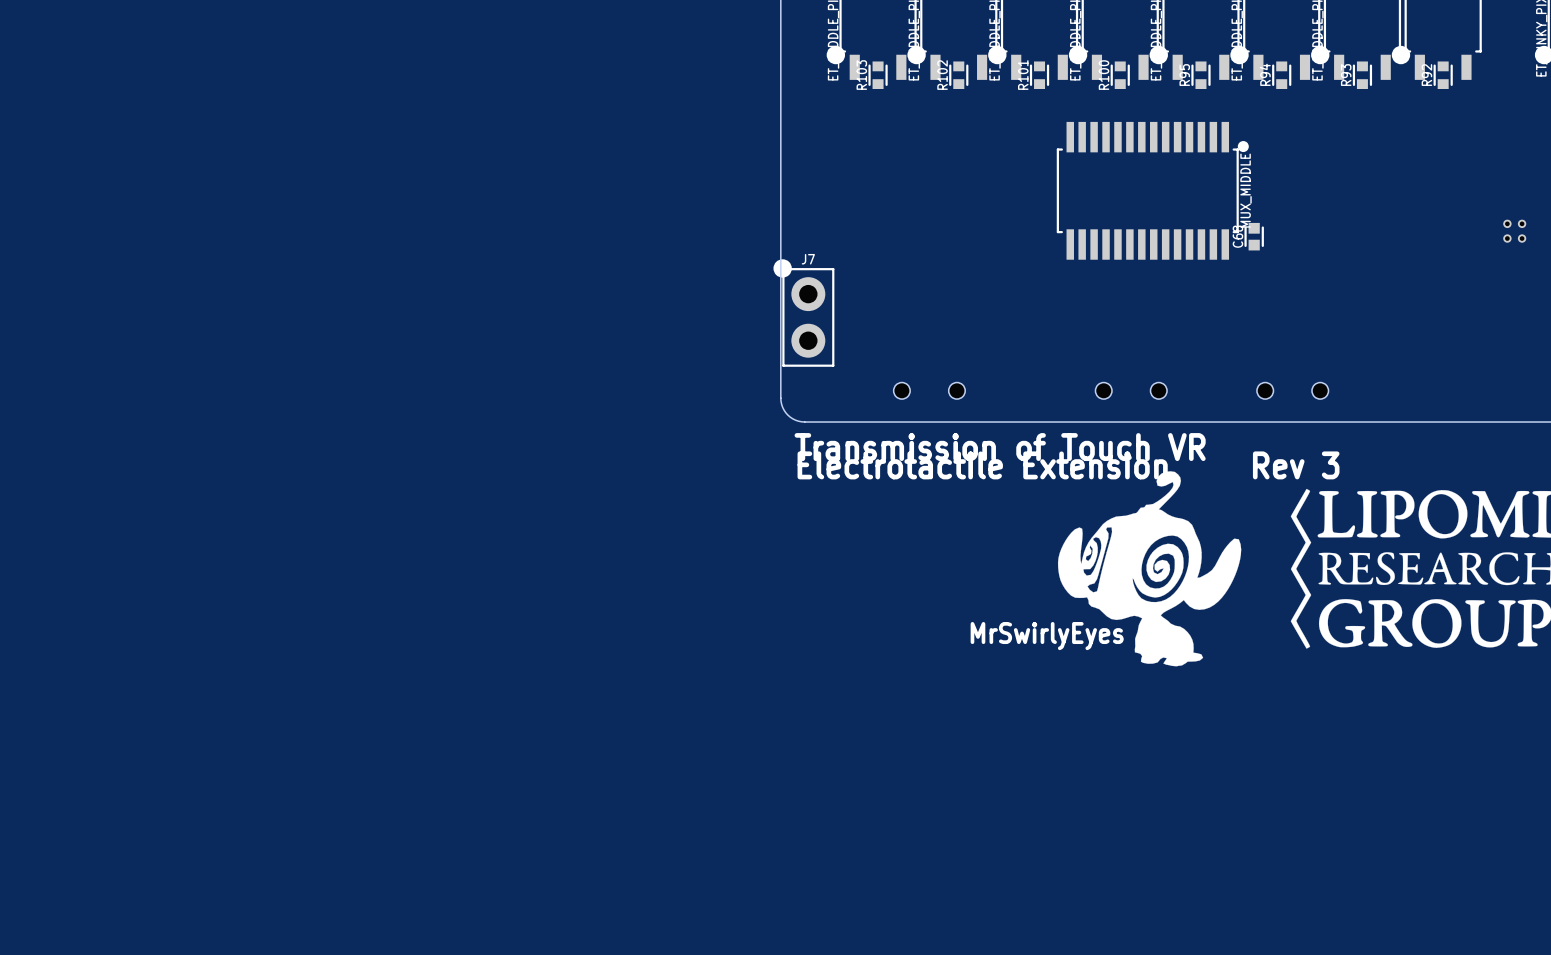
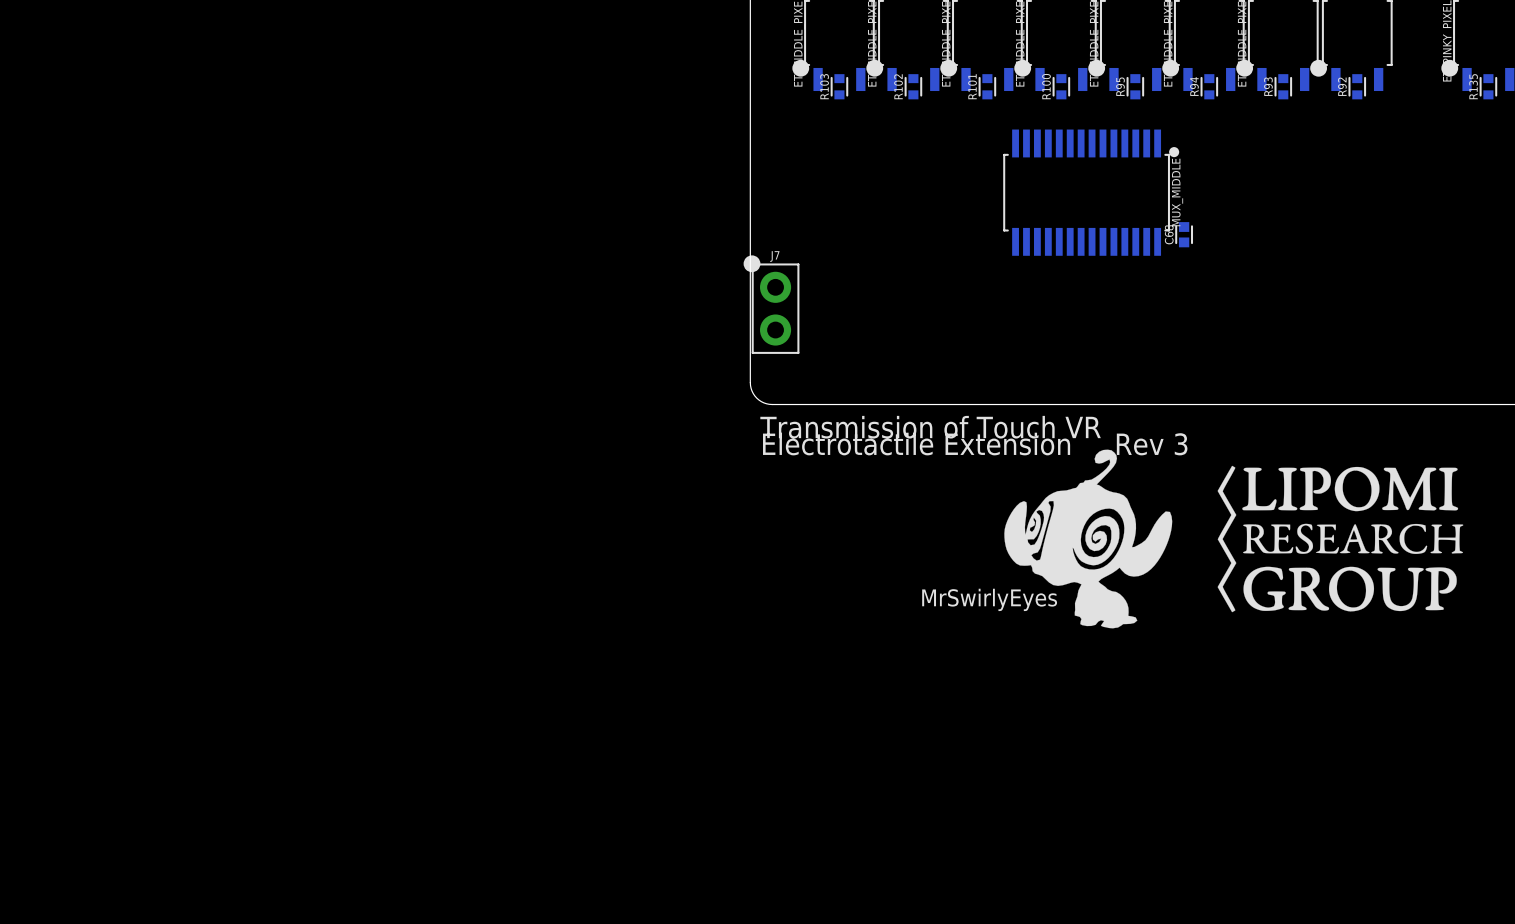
part: (1514, 231) -> none
part: (929, 390) -> none
part: (1131, 390) -> none
part: (1292, 390) -> none

